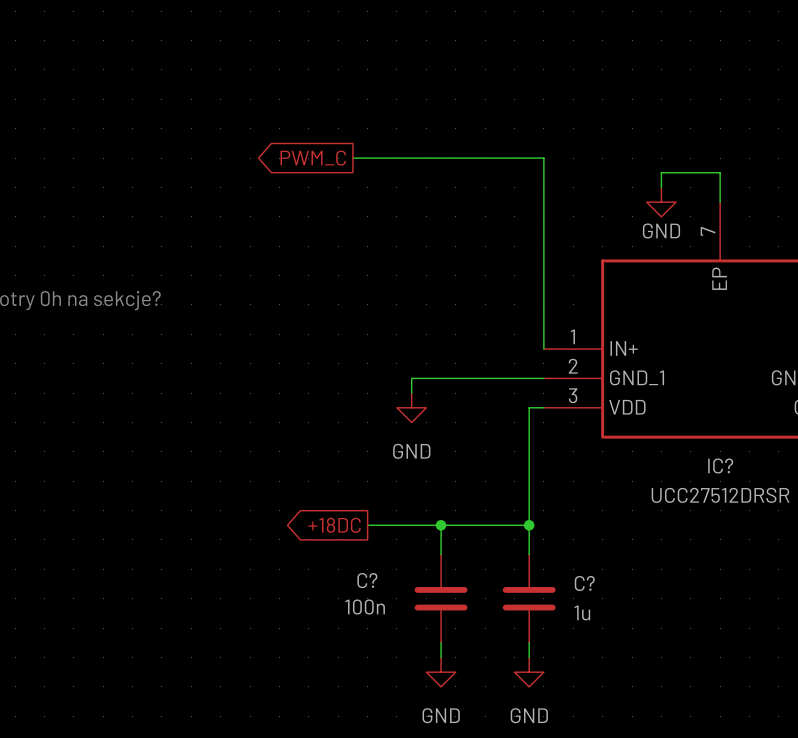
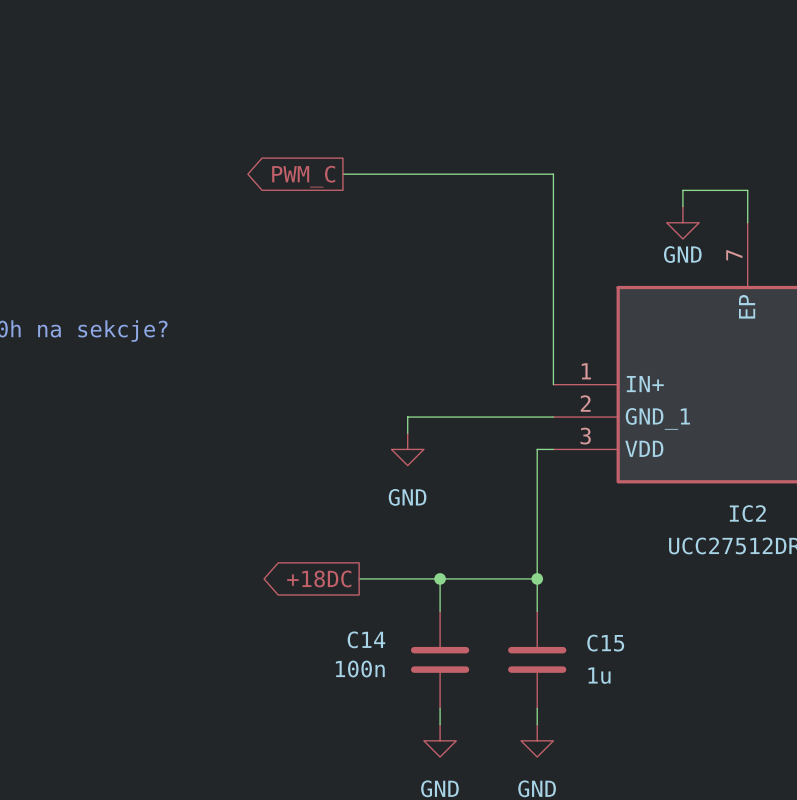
IC? name: IC? (720, 465) -> IC2 (747, 513)
C? name: C? (367, 580) -> C14 (366, 639)
C? name: C? (584, 583) -> C15 (605, 643)

